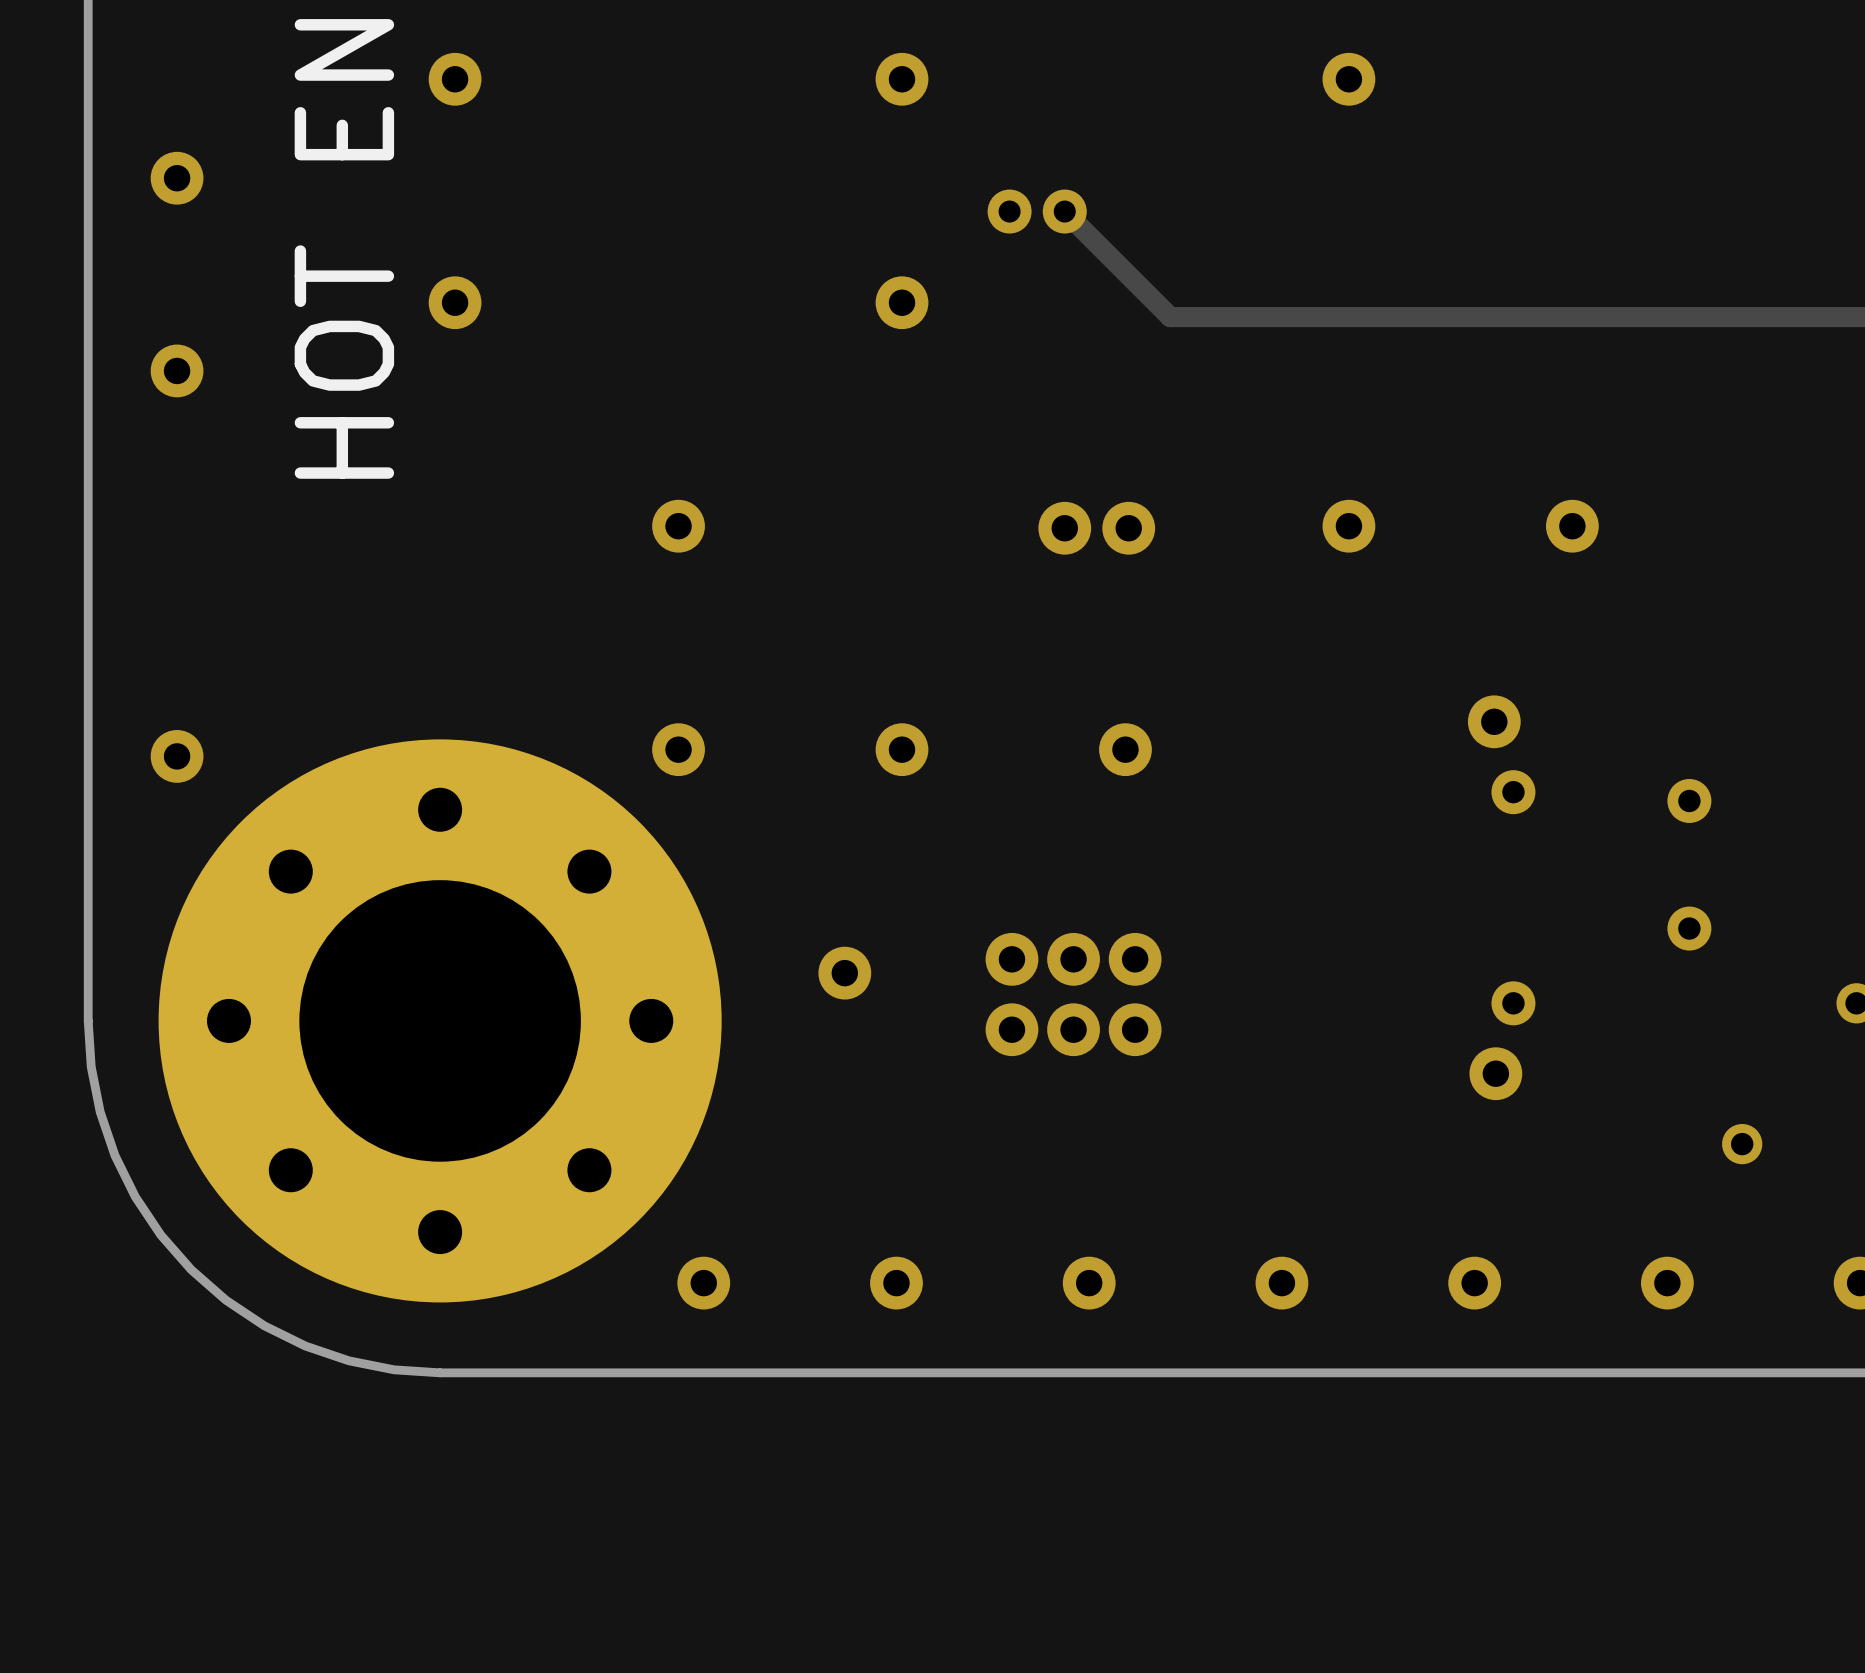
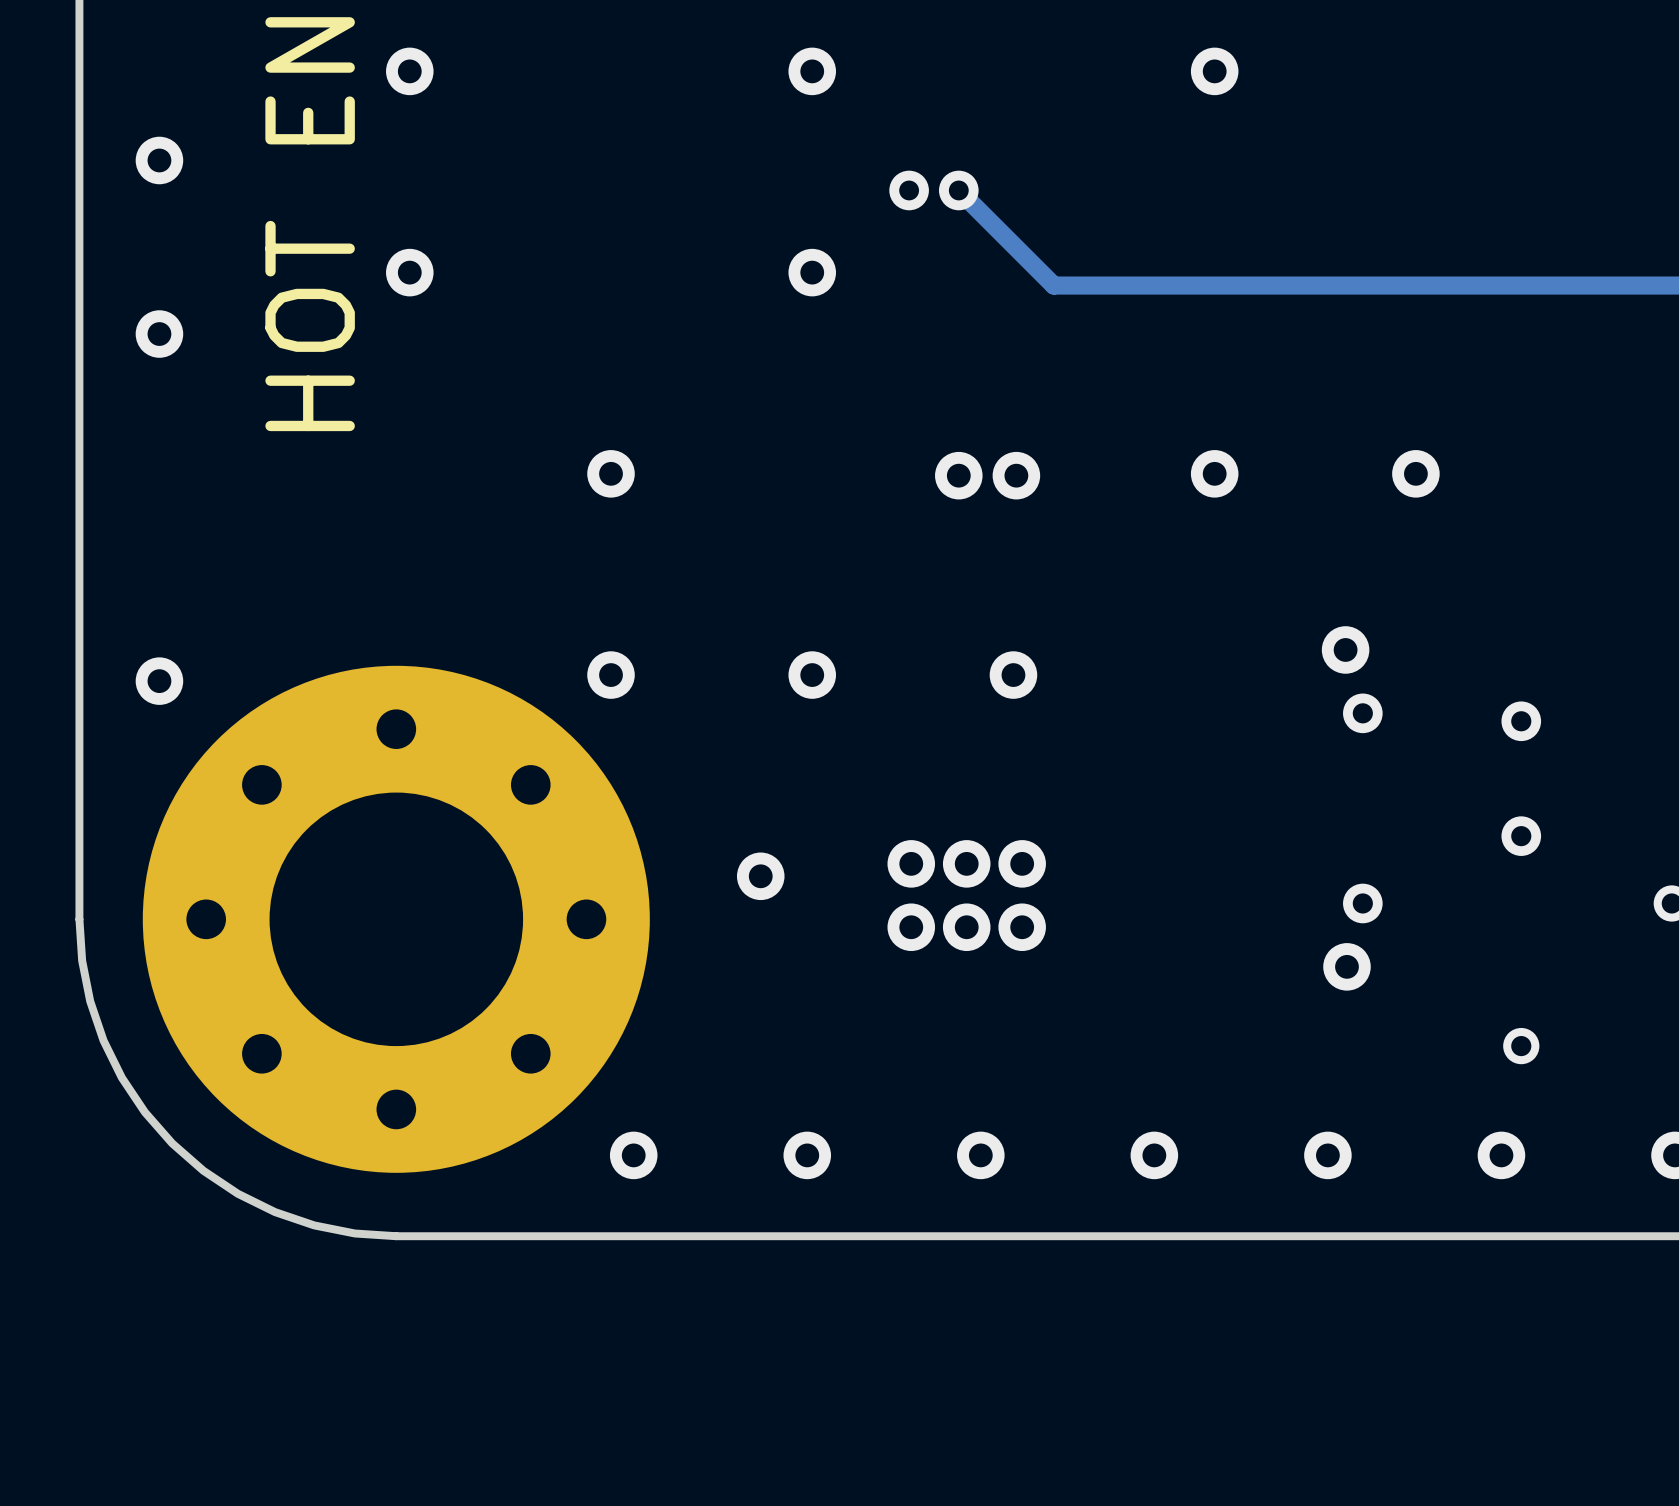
via position: (1742, 1144) -> (1521, 1046)

